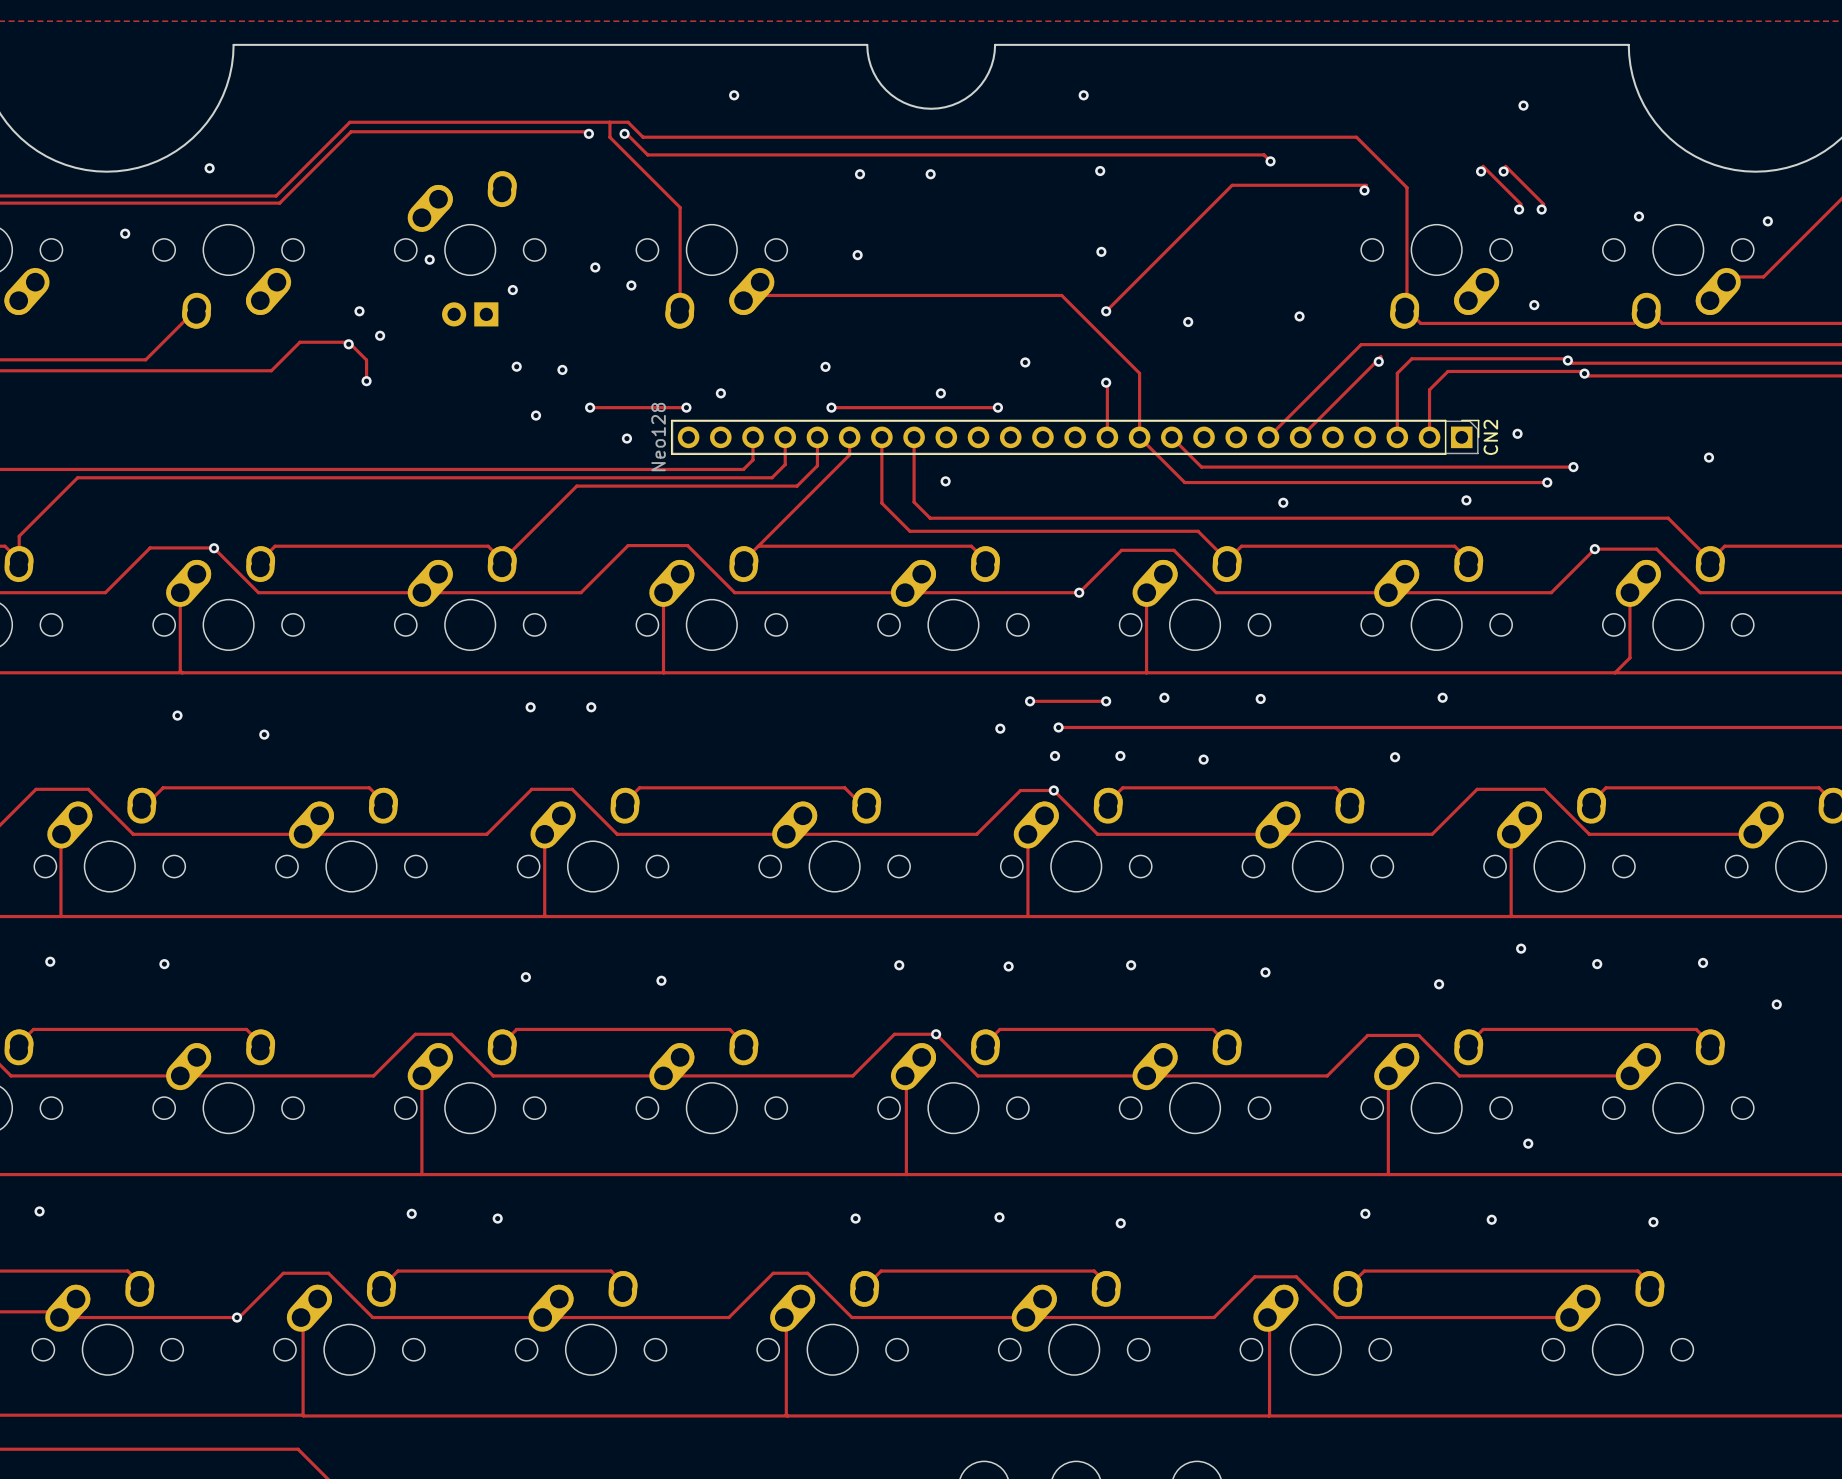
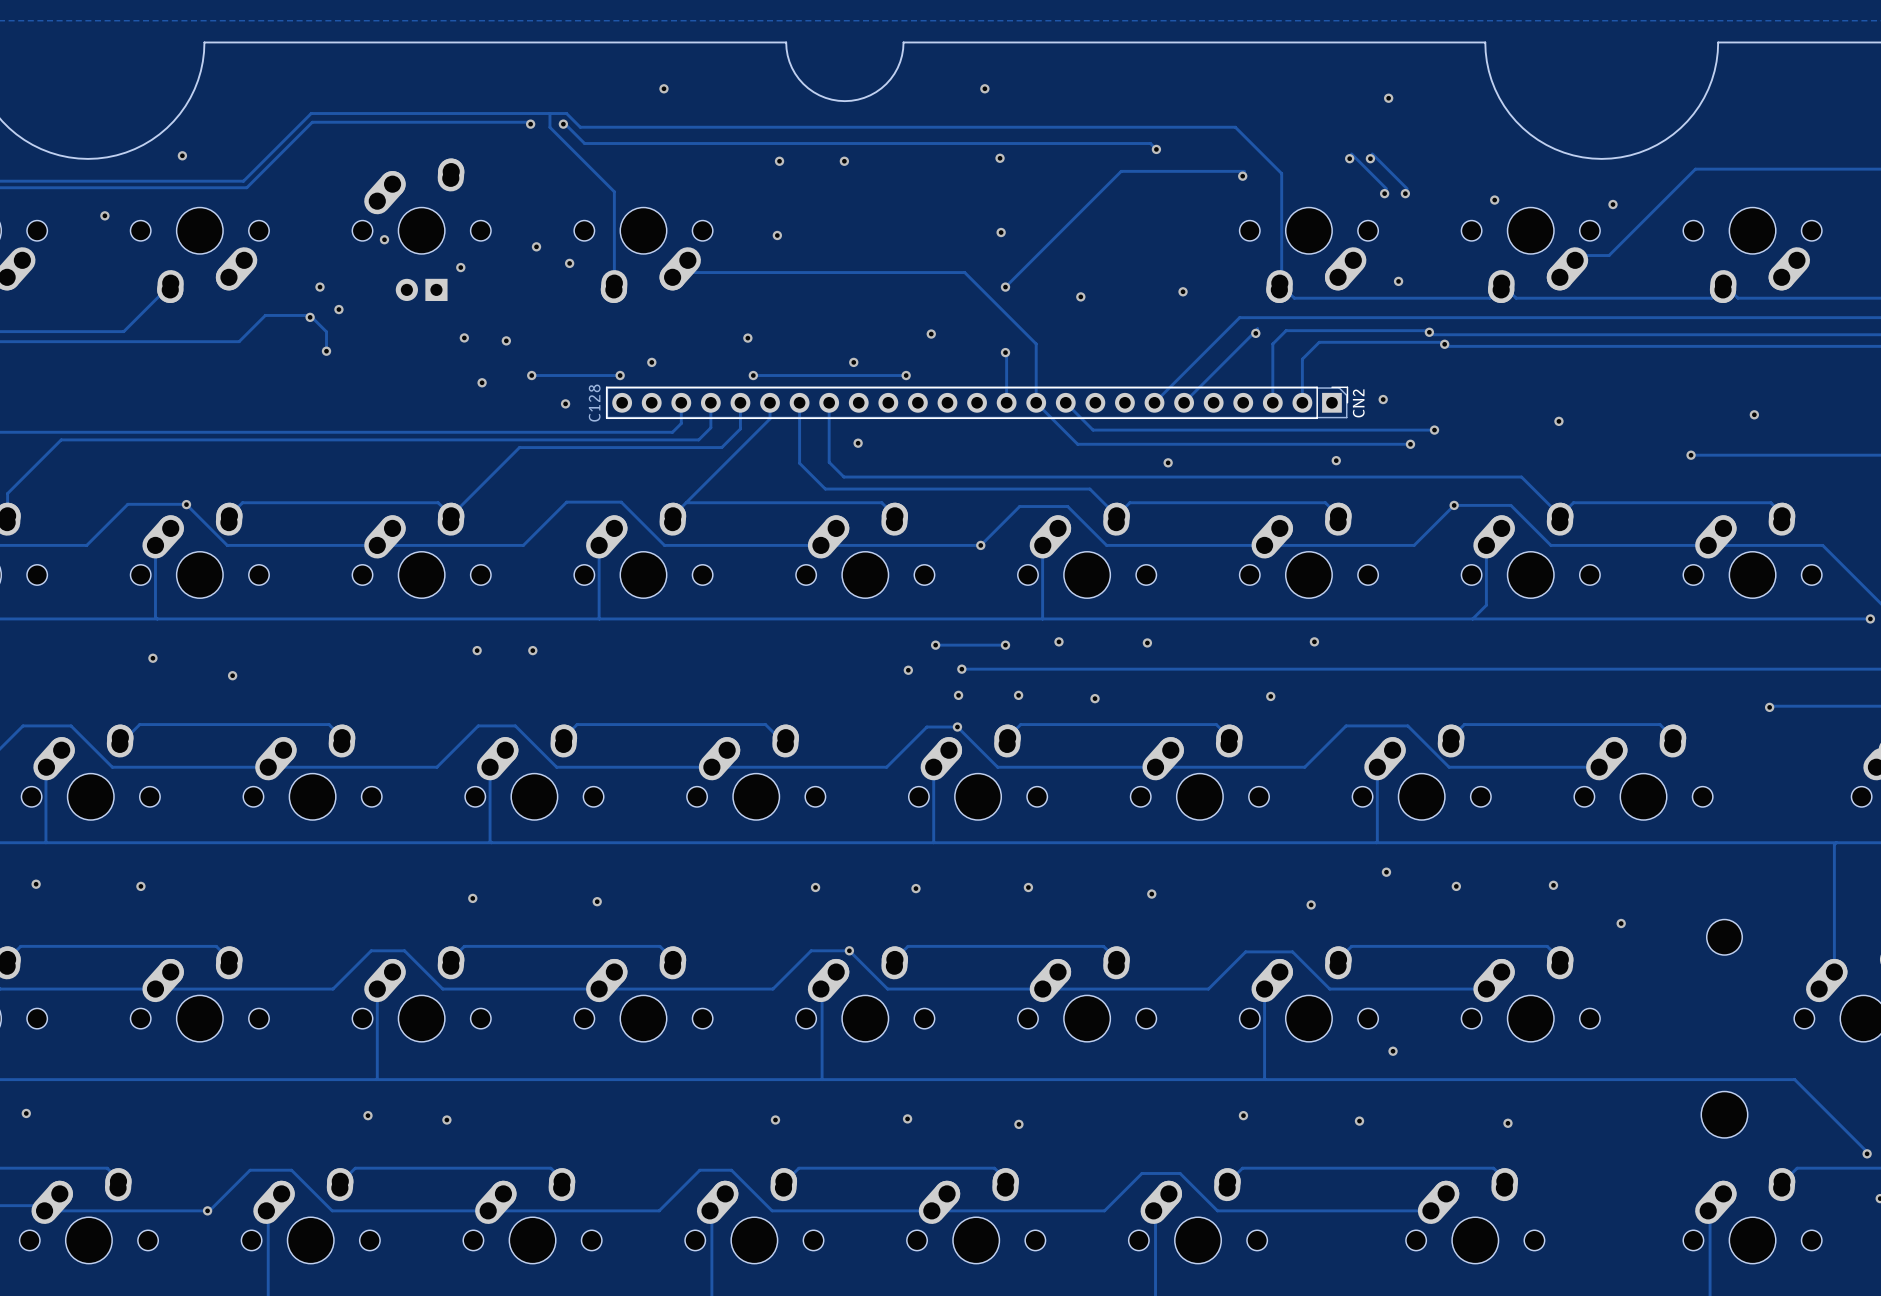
CN2 value: Neo128 (658, 437) -> C128 (594, 403)

